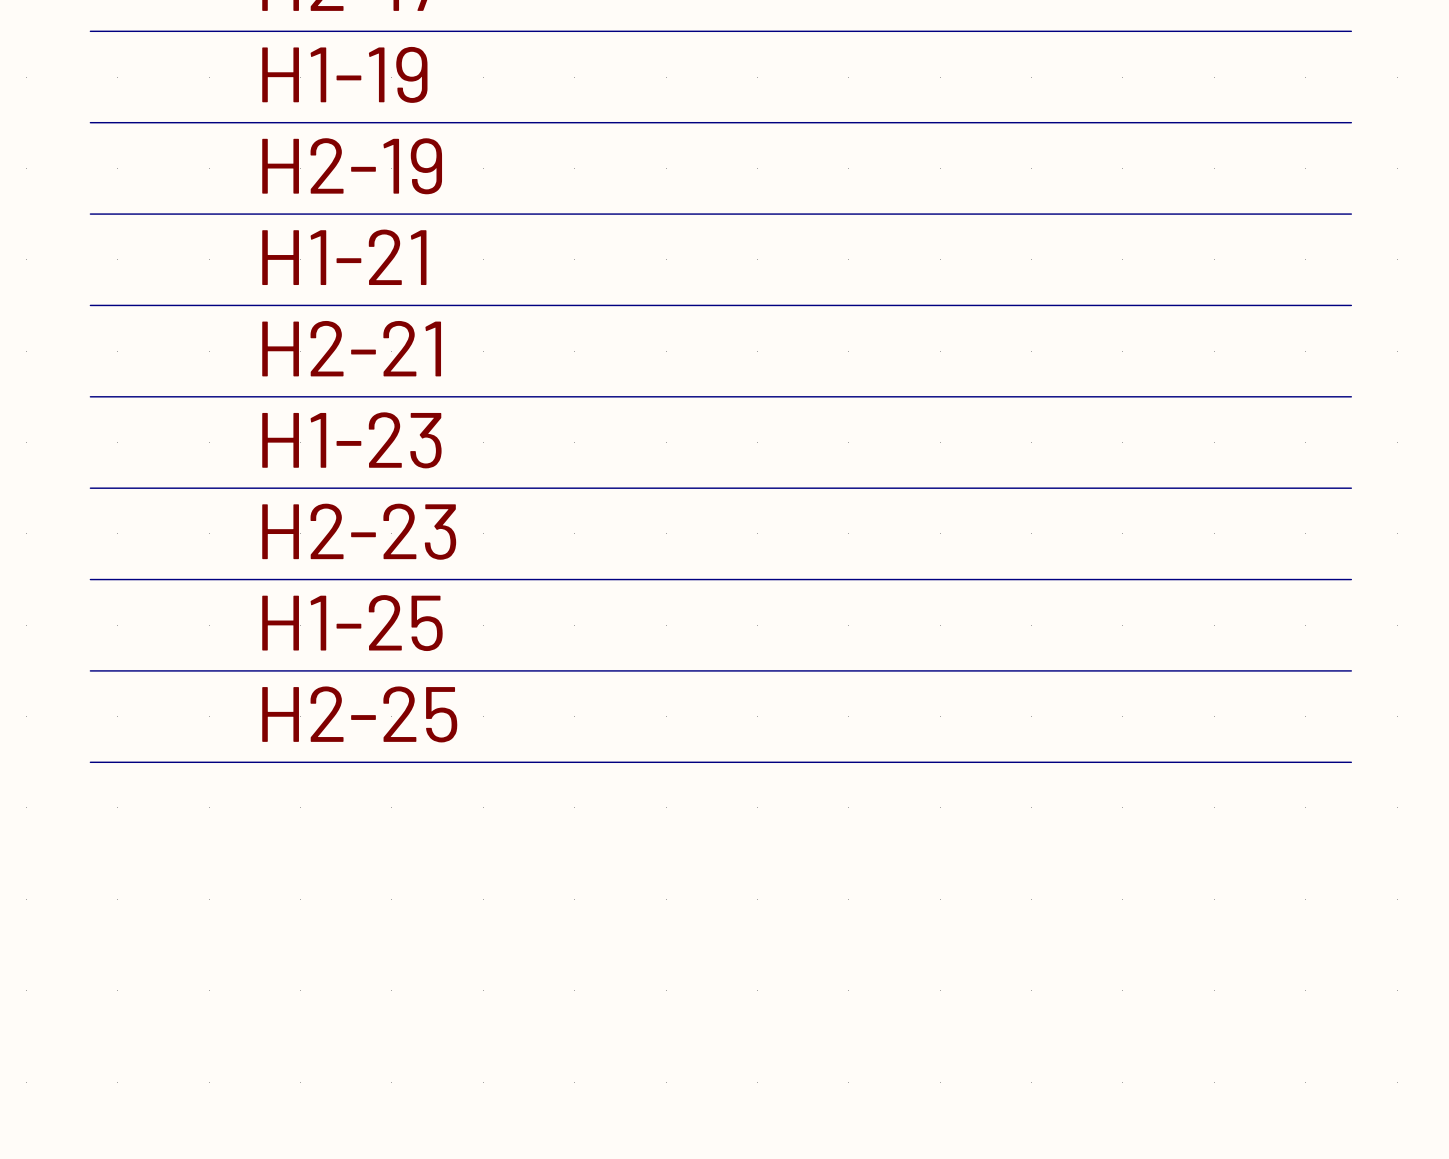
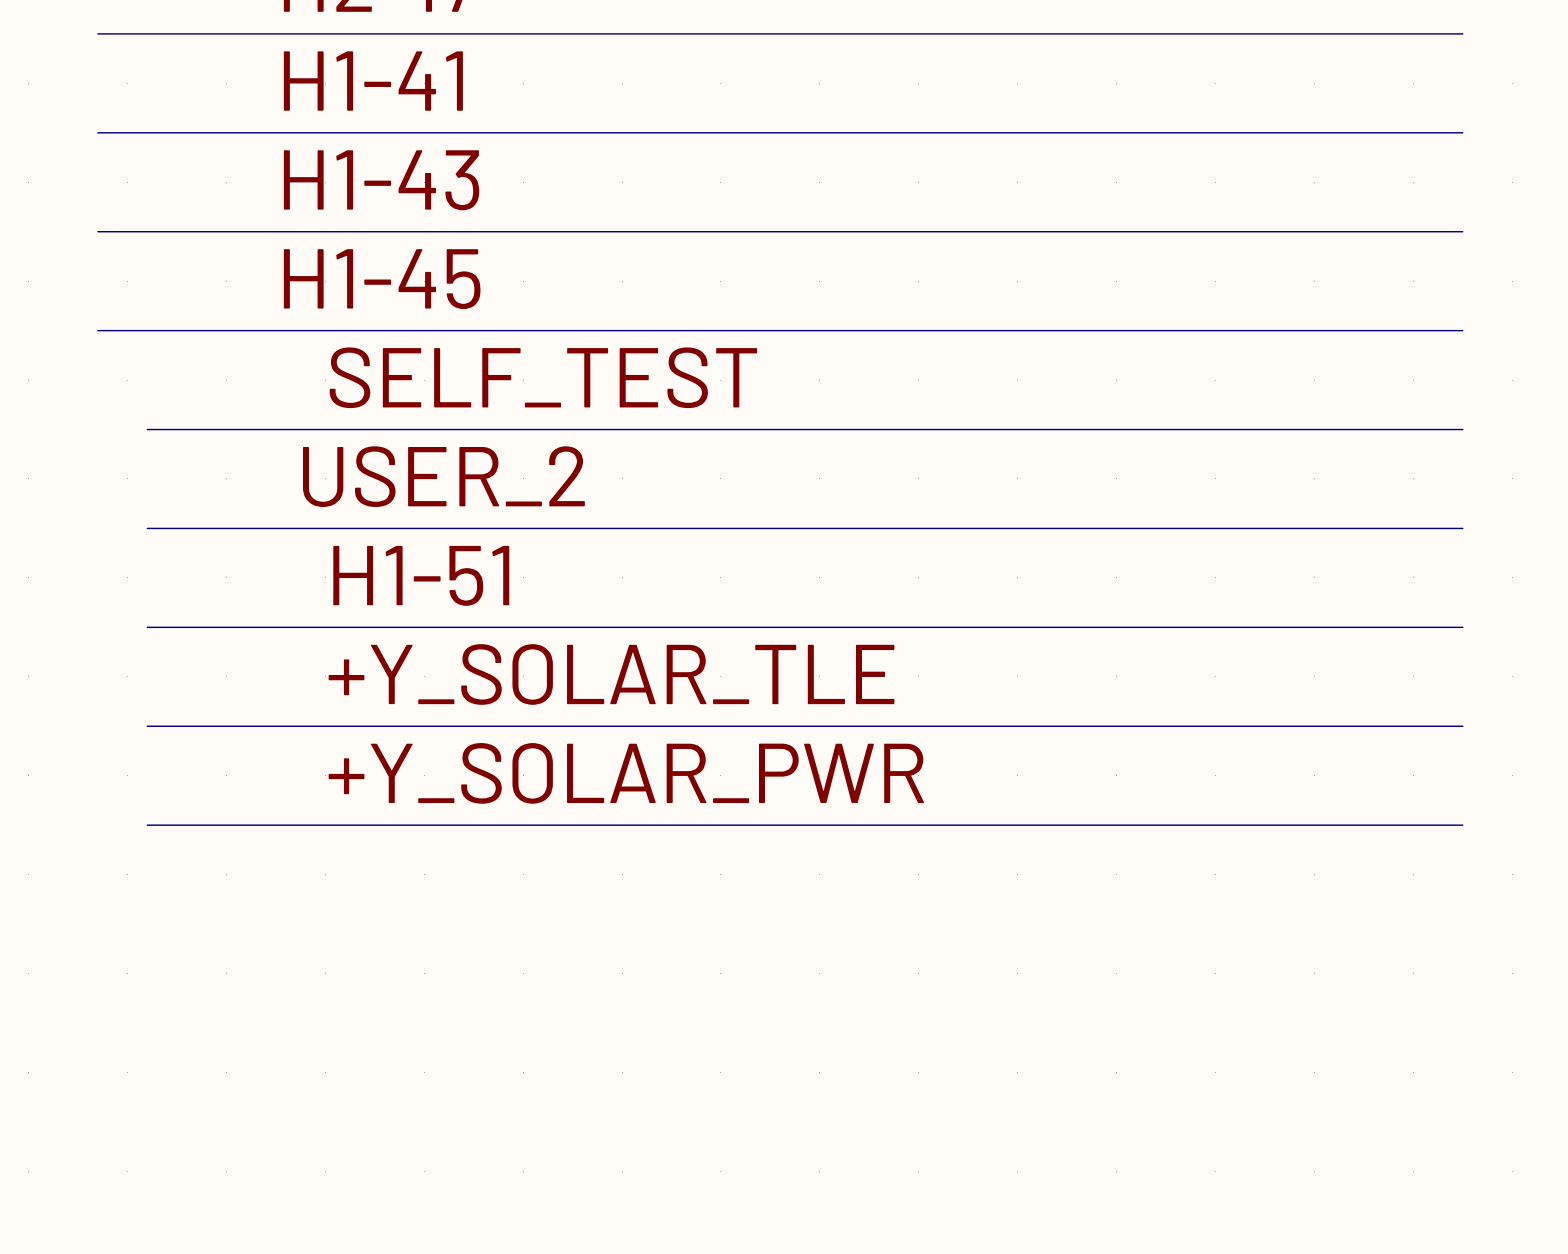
label: H1-19 (344, 74) -> H1-41 (373, 81)
label: H2-19 (352, 166) -> H1-43 (381, 180)
label: H1-21 (344, 257) -> H1-45 (382, 279)
label: H2-21 (351, 348) -> none
label: none -> SELF_TEST (543, 377)
wire: (90, 396) (136, 396) -> none
label: H1-23 (351, 440) -> USER_2 (443, 476)
wire: (90, 488) (136, 488) -> none
label: H2-23 (359, 531) -> none
wire: (90, 579) (136, 579) -> none
label: H1-25 (352, 623) -> H1-51 (421, 575)
label: none -> +Y_SOLAR_TLE (611, 674)
wire: (90, 670) (136, 670) -> none
label: H2-25 (359, 714) -> none
label: none -> +Y_SOLAR_PWR (626, 773)
wire: (90, 762) (136, 762) -> none

